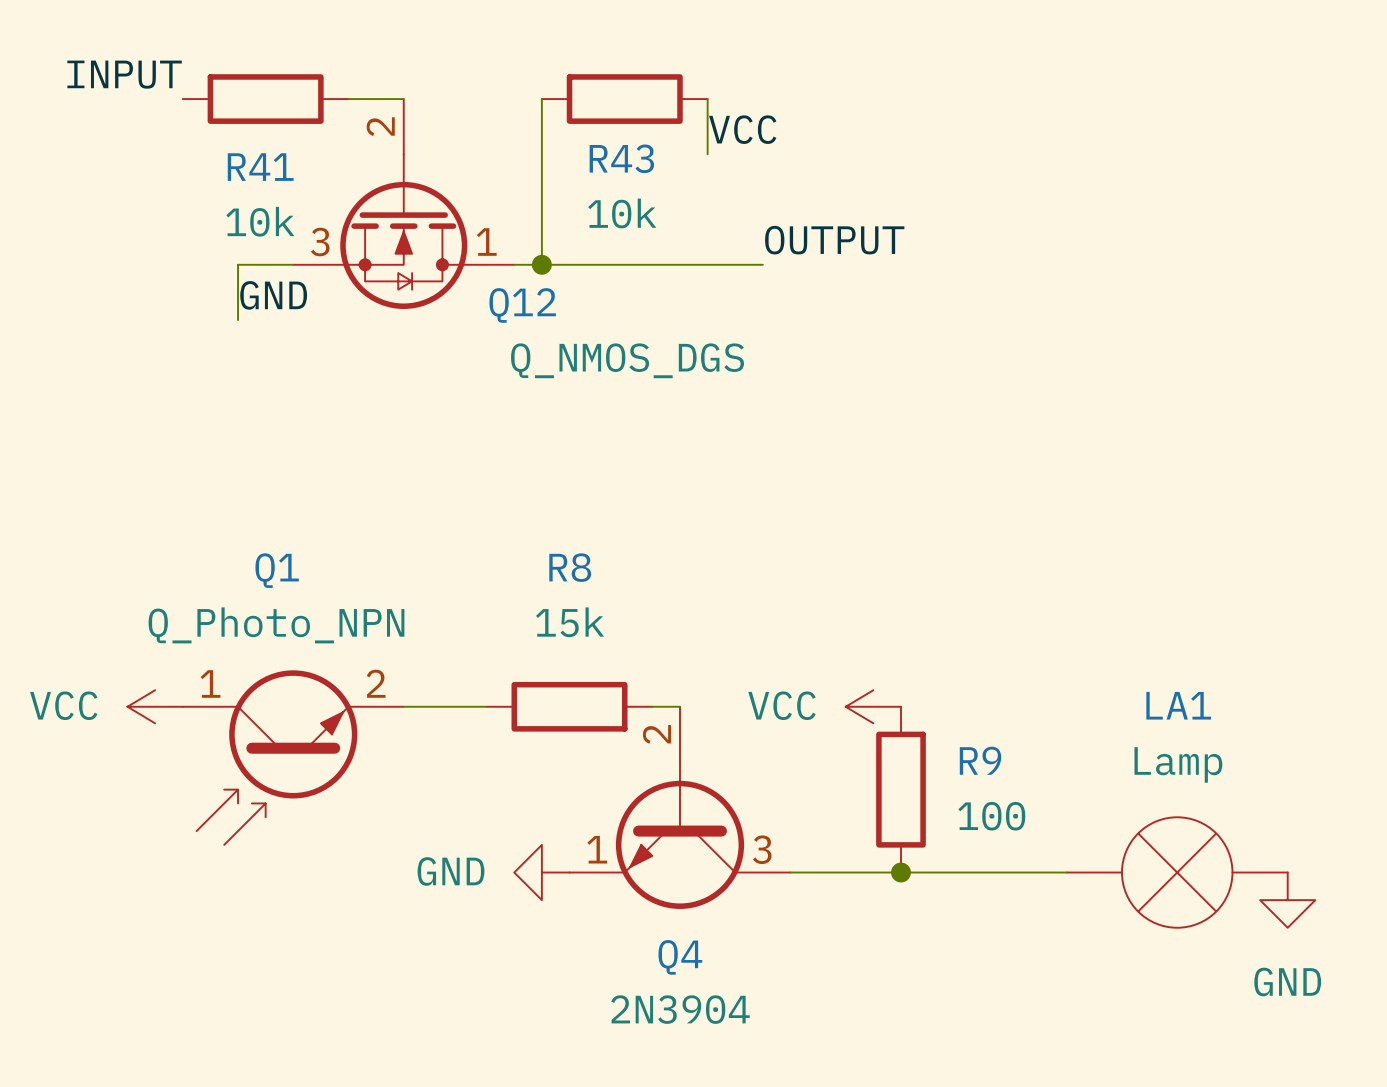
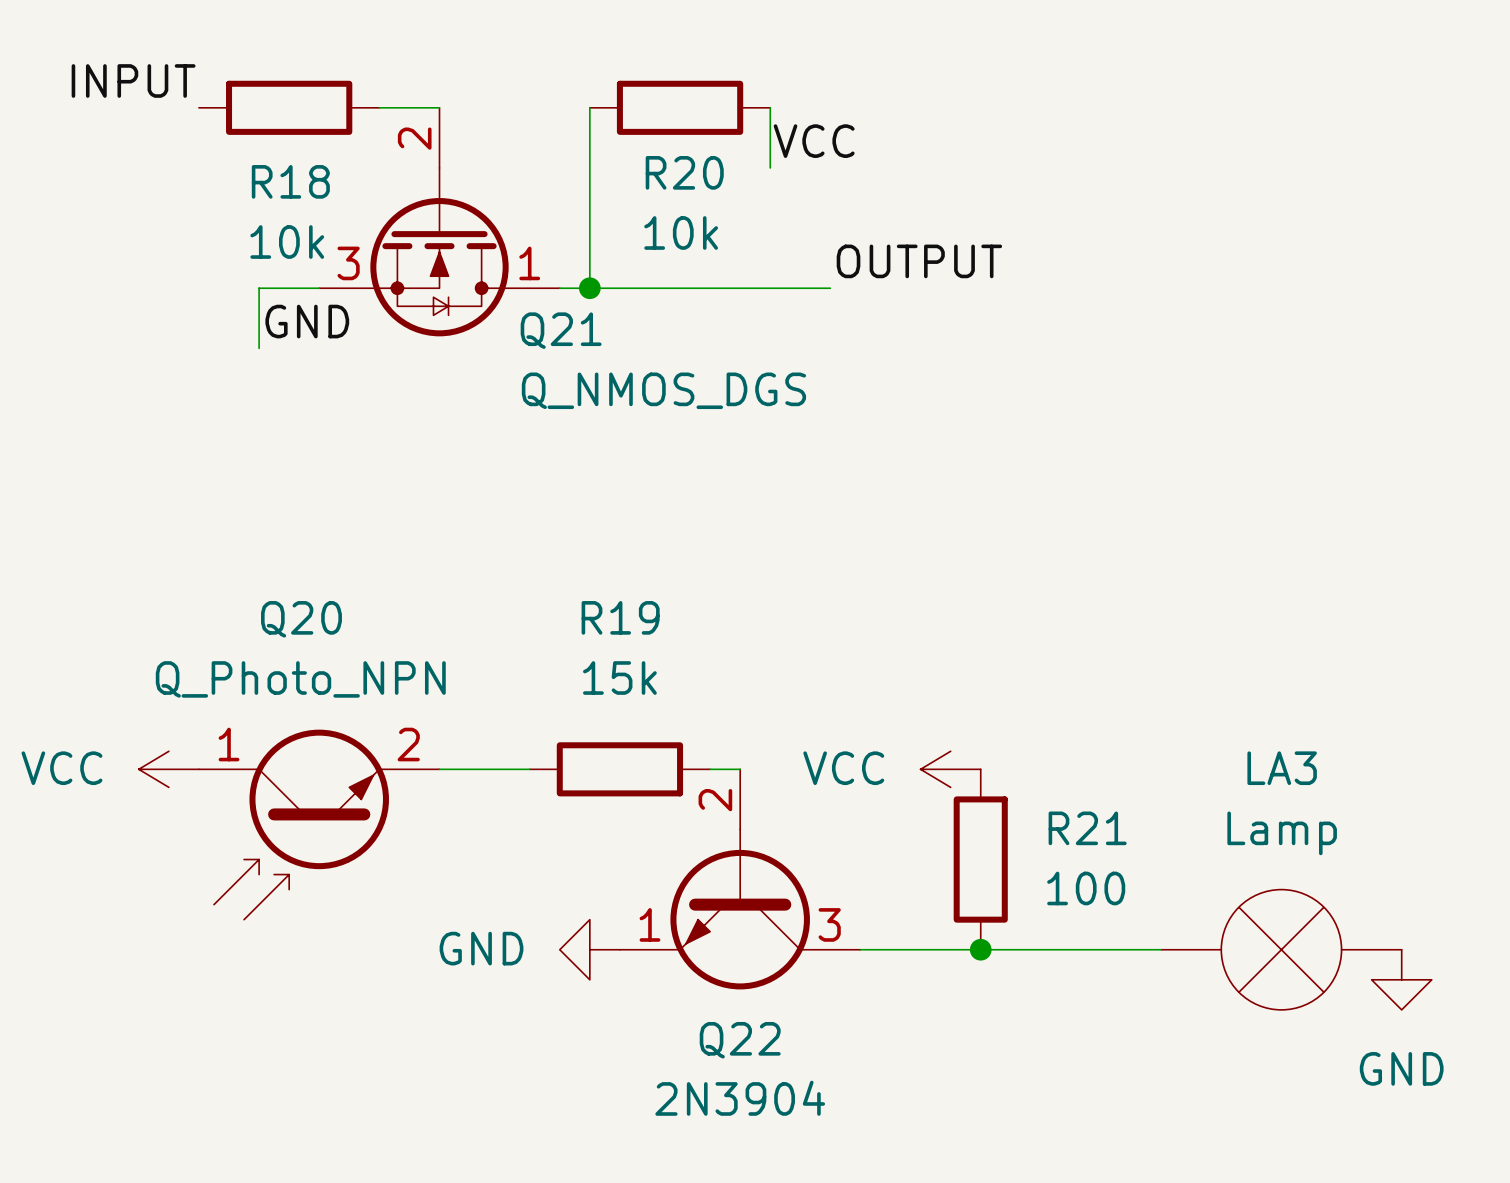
R43 name: R43 (621, 158) -> R20 (684, 172)
R41 name: R41 (260, 167) -> R18 (290, 181)
Q12 name: Q12 (522, 305) -> Q21 (561, 330)
R8 name: R8 (570, 567) -> R19 (620, 617)
Q1 name: Q1 (277, 570) -> Q20 (301, 619)
LA1 name: LA1 (1178, 705) -> LA3 (1282, 768)
R9 name: R9 (980, 760) -> R21 (1087, 828)
Q4 name: Q4 (680, 957) -> Q22 (740, 1040)

